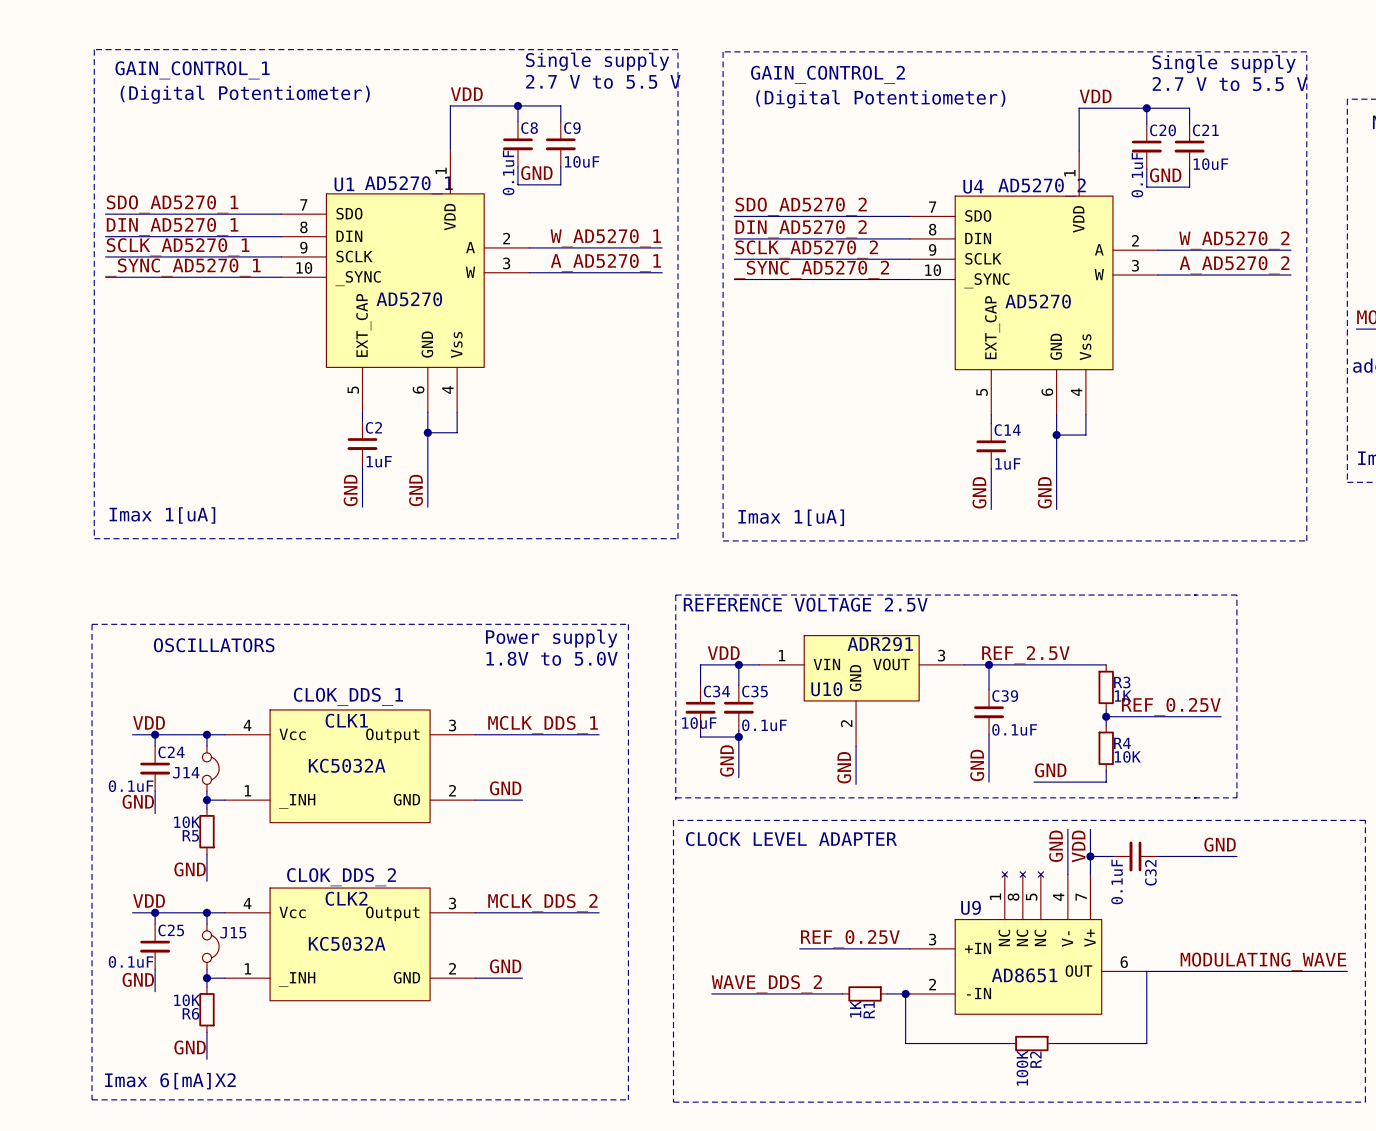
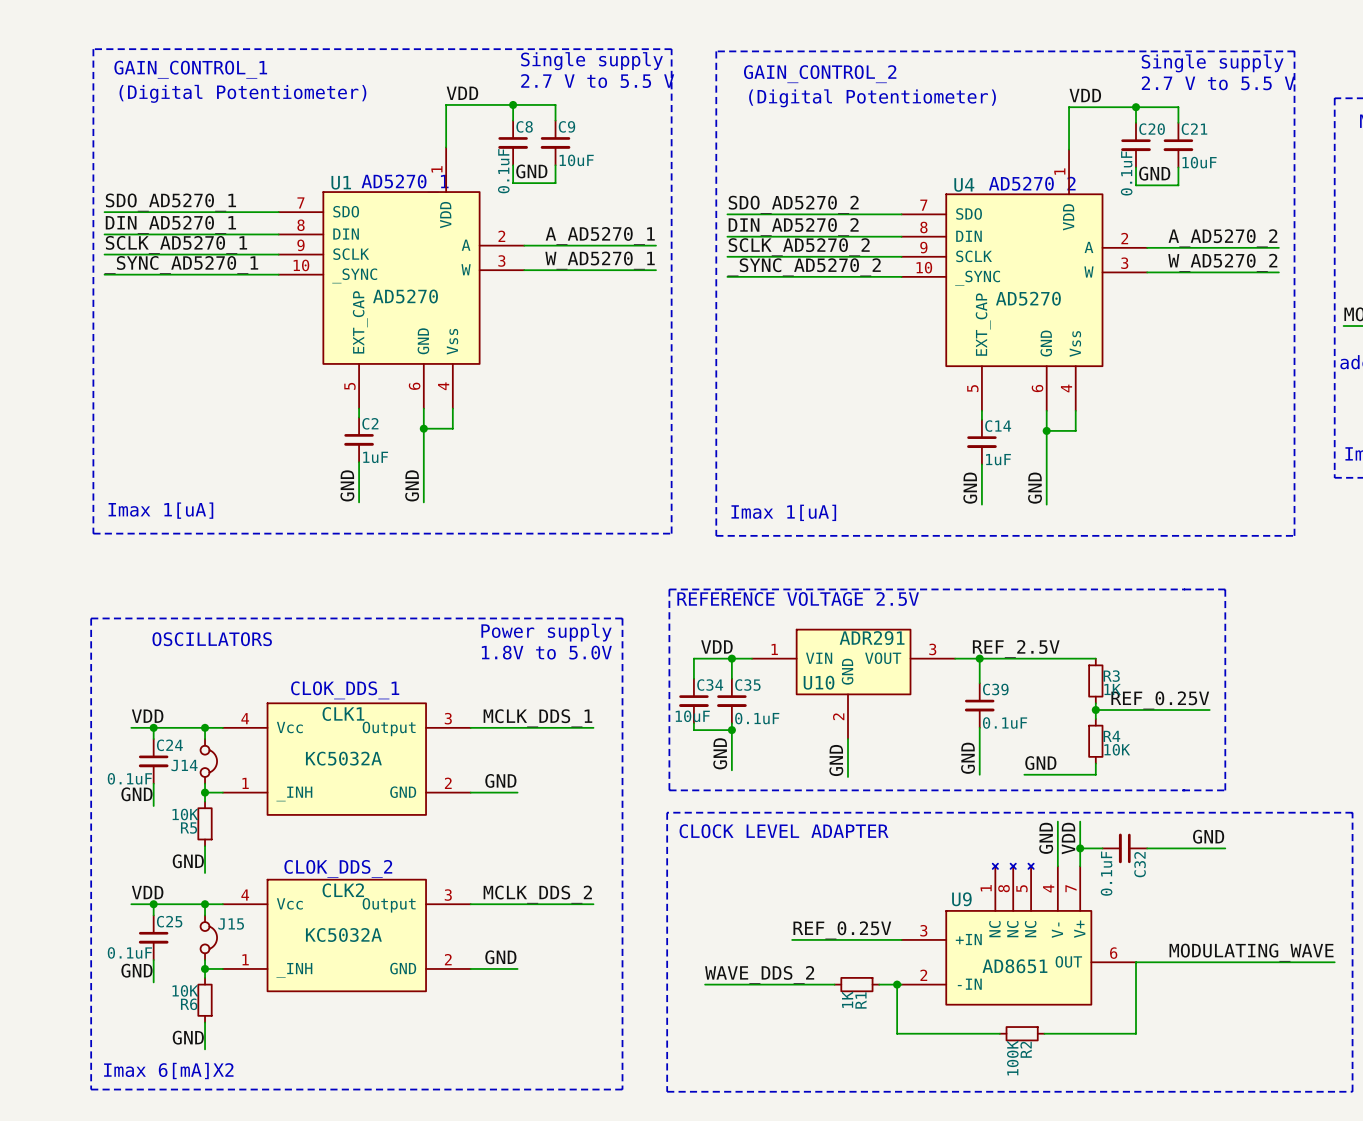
label: W_AD5270_1 (605, 238) -> A_AD5270_1 (600, 235)
label: W_AD5270_2 (1234, 240) -> A_AD5270_2 (1222, 238)
label: A_AD5270_1 (605, 263) -> W_AD5270_1 (600, 260)
label: A_AD5270_2 (1234, 265) -> W_AD5270_2 (1222, 262)

